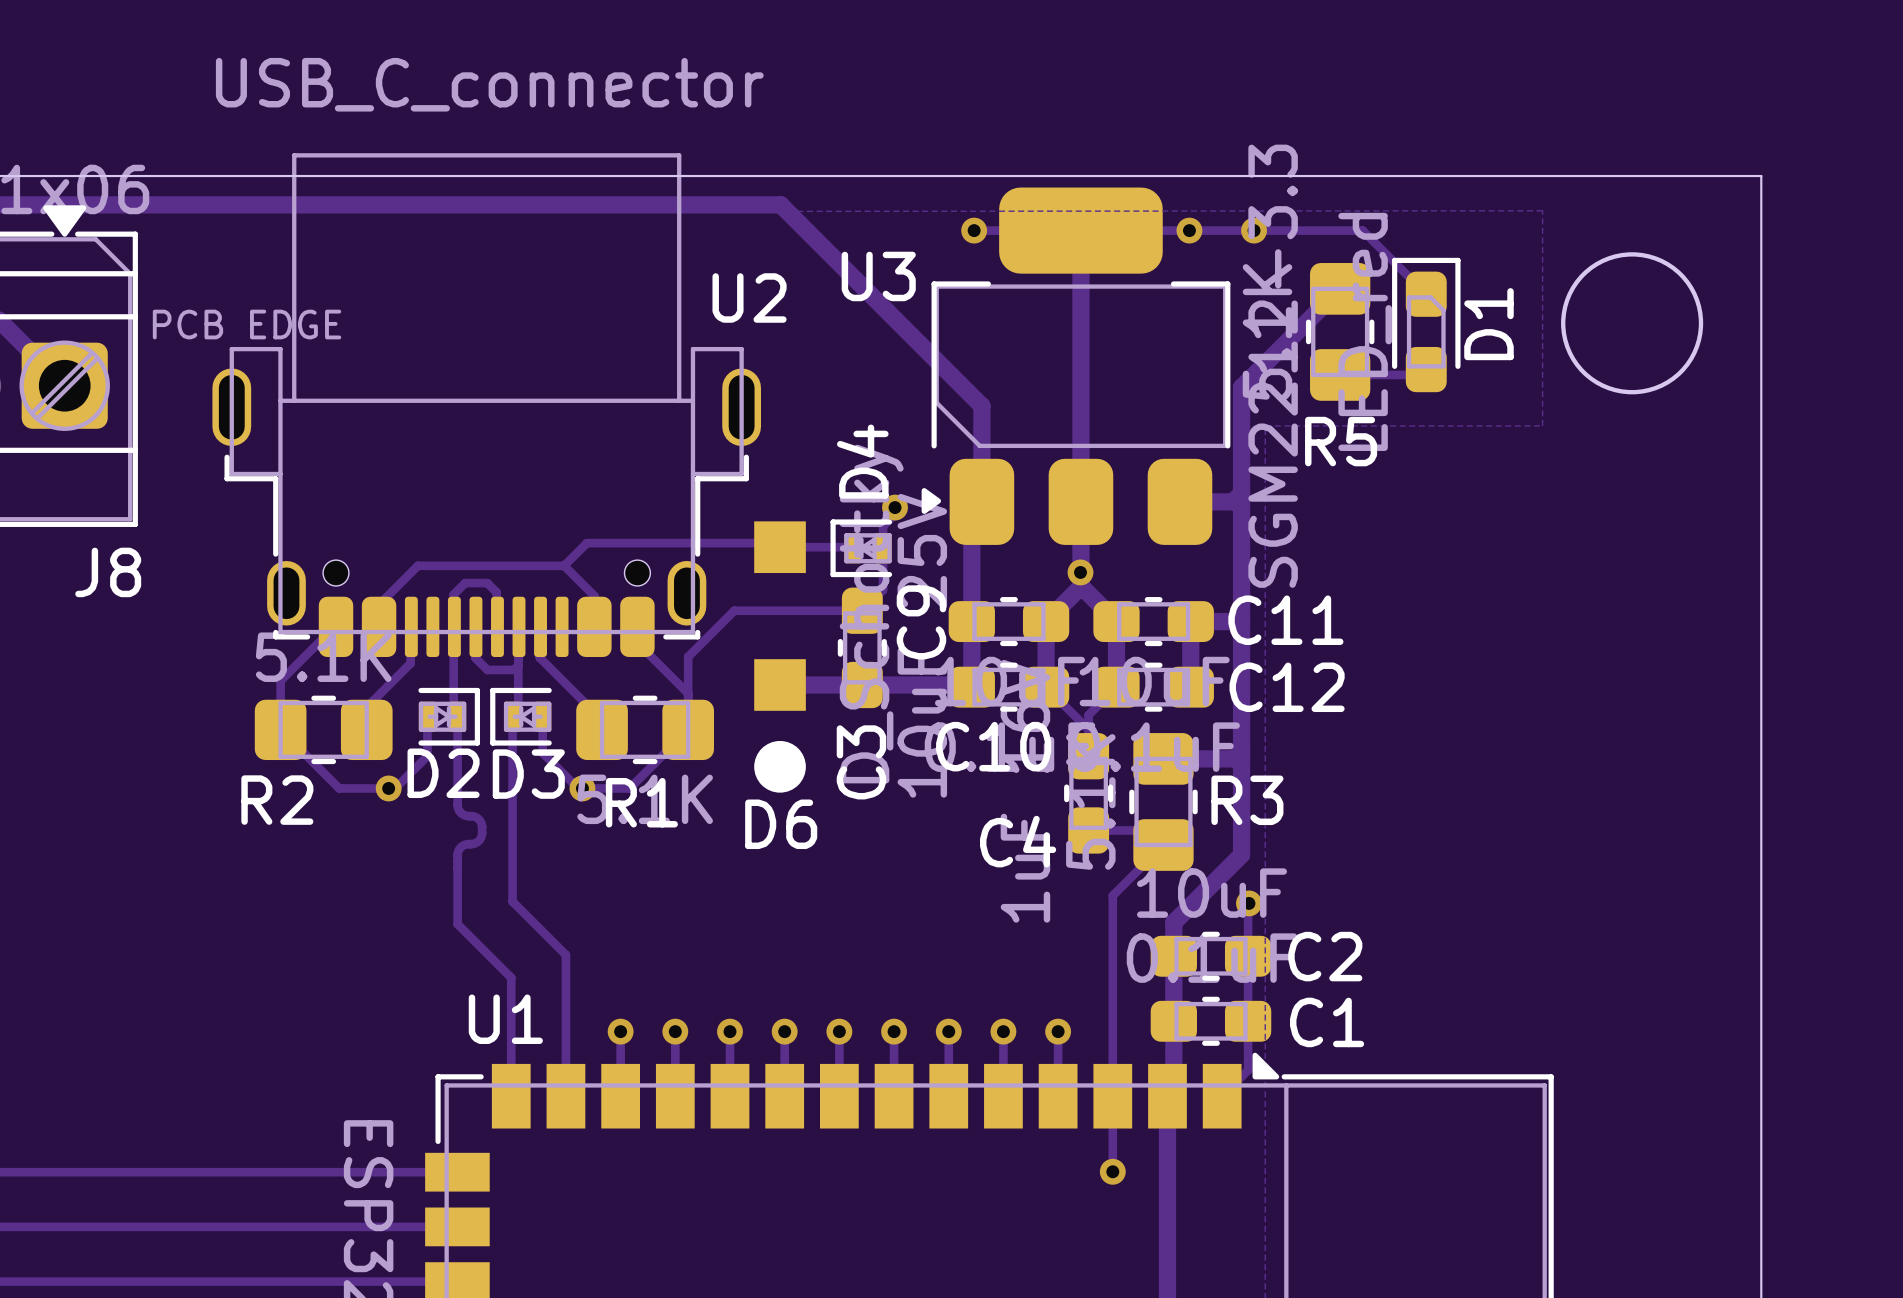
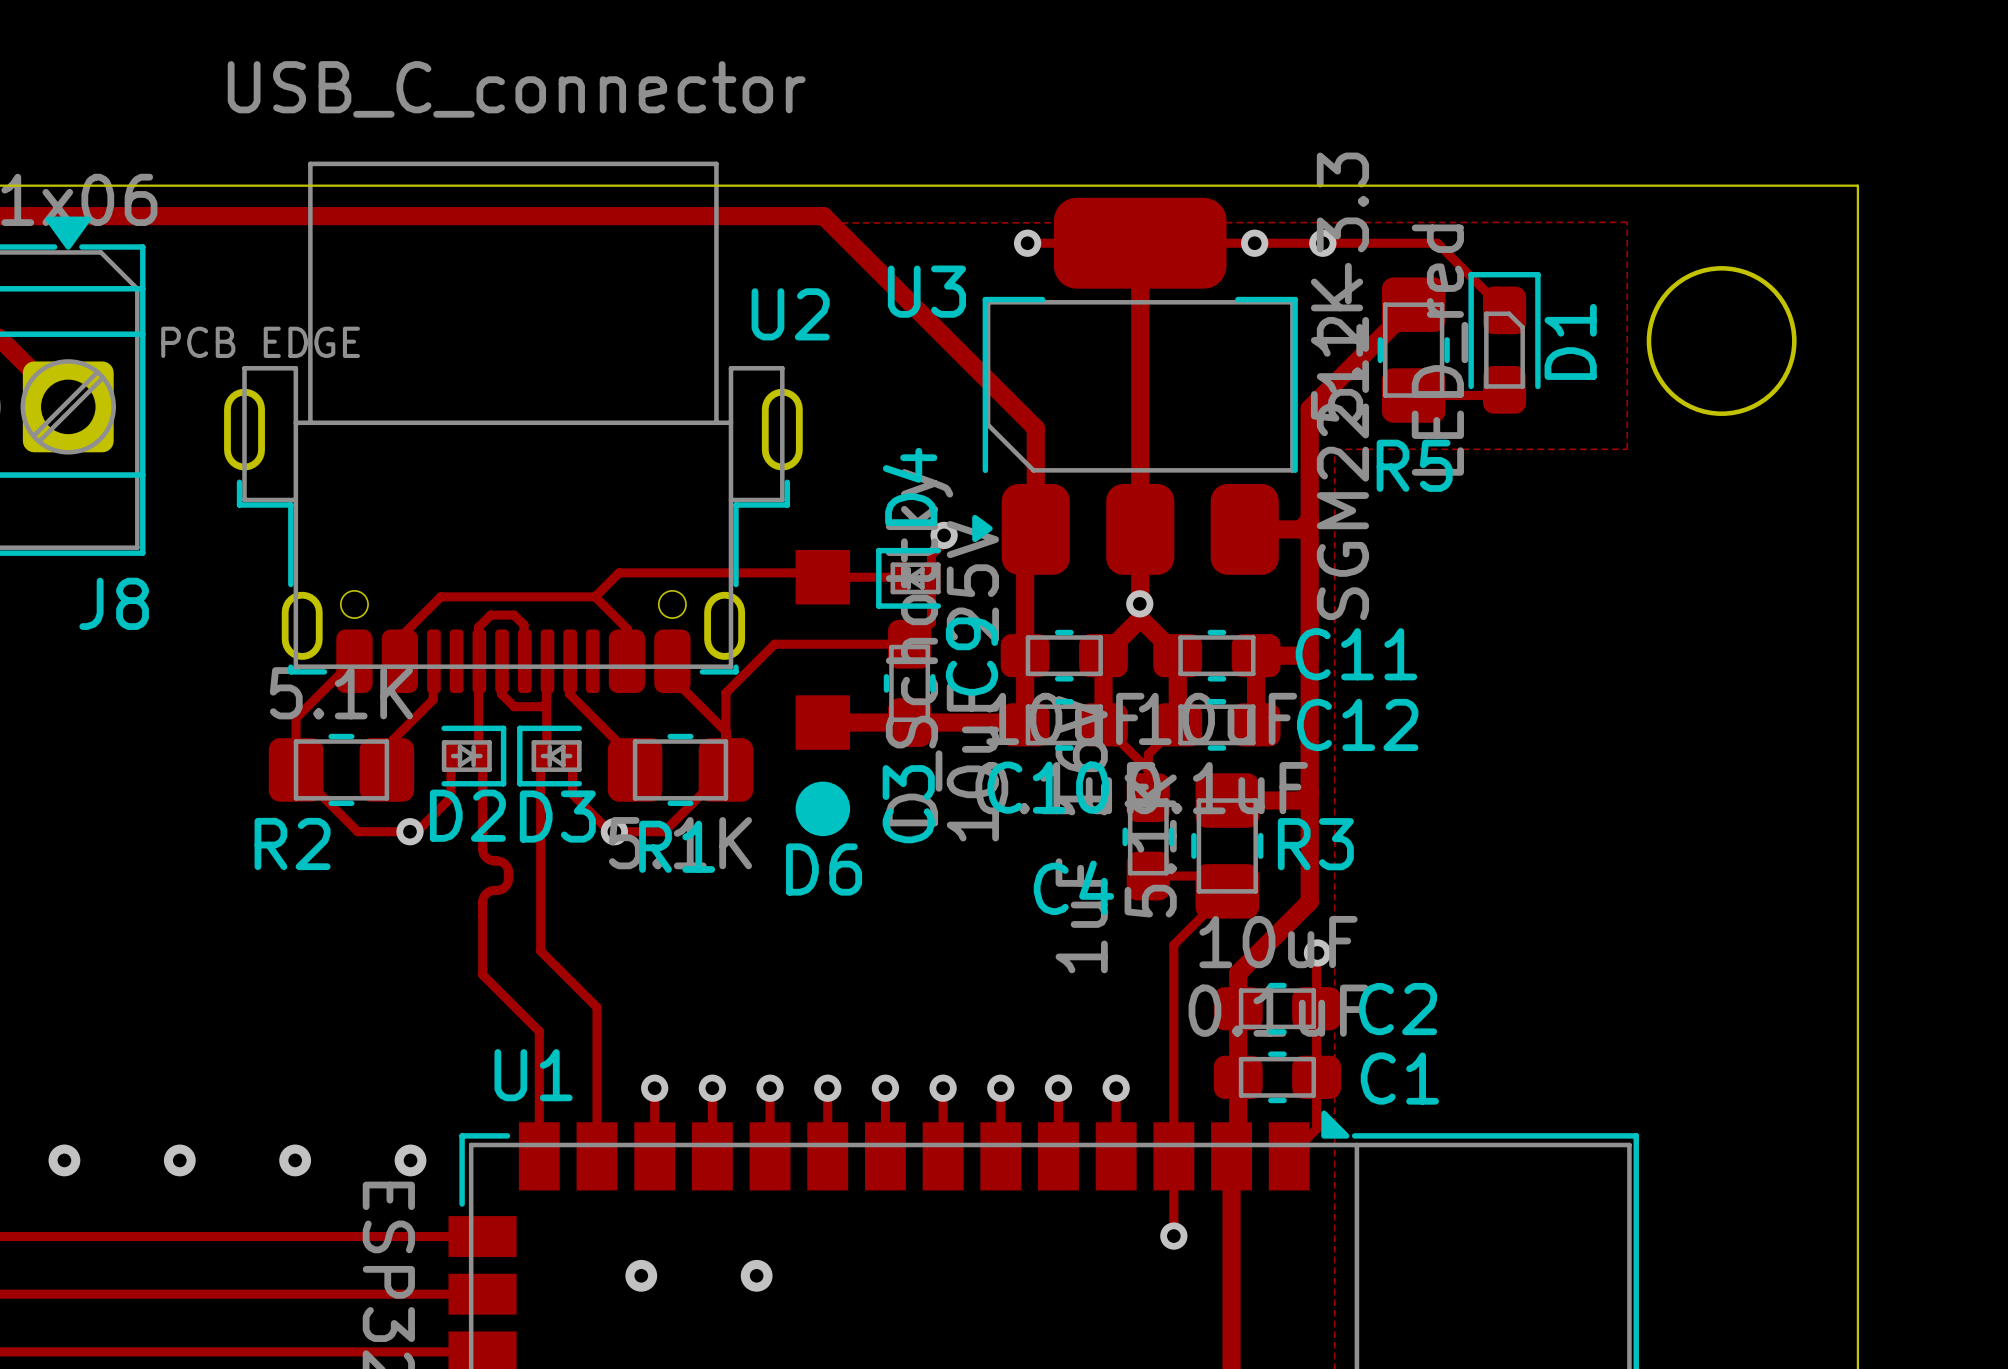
via: none -> (64, 1160)
via: none -> (179, 1160)
via: none -> (295, 1160)
via: none -> (410, 1160)
via: none -> (641, 1275)
via: none -> (756, 1275)

